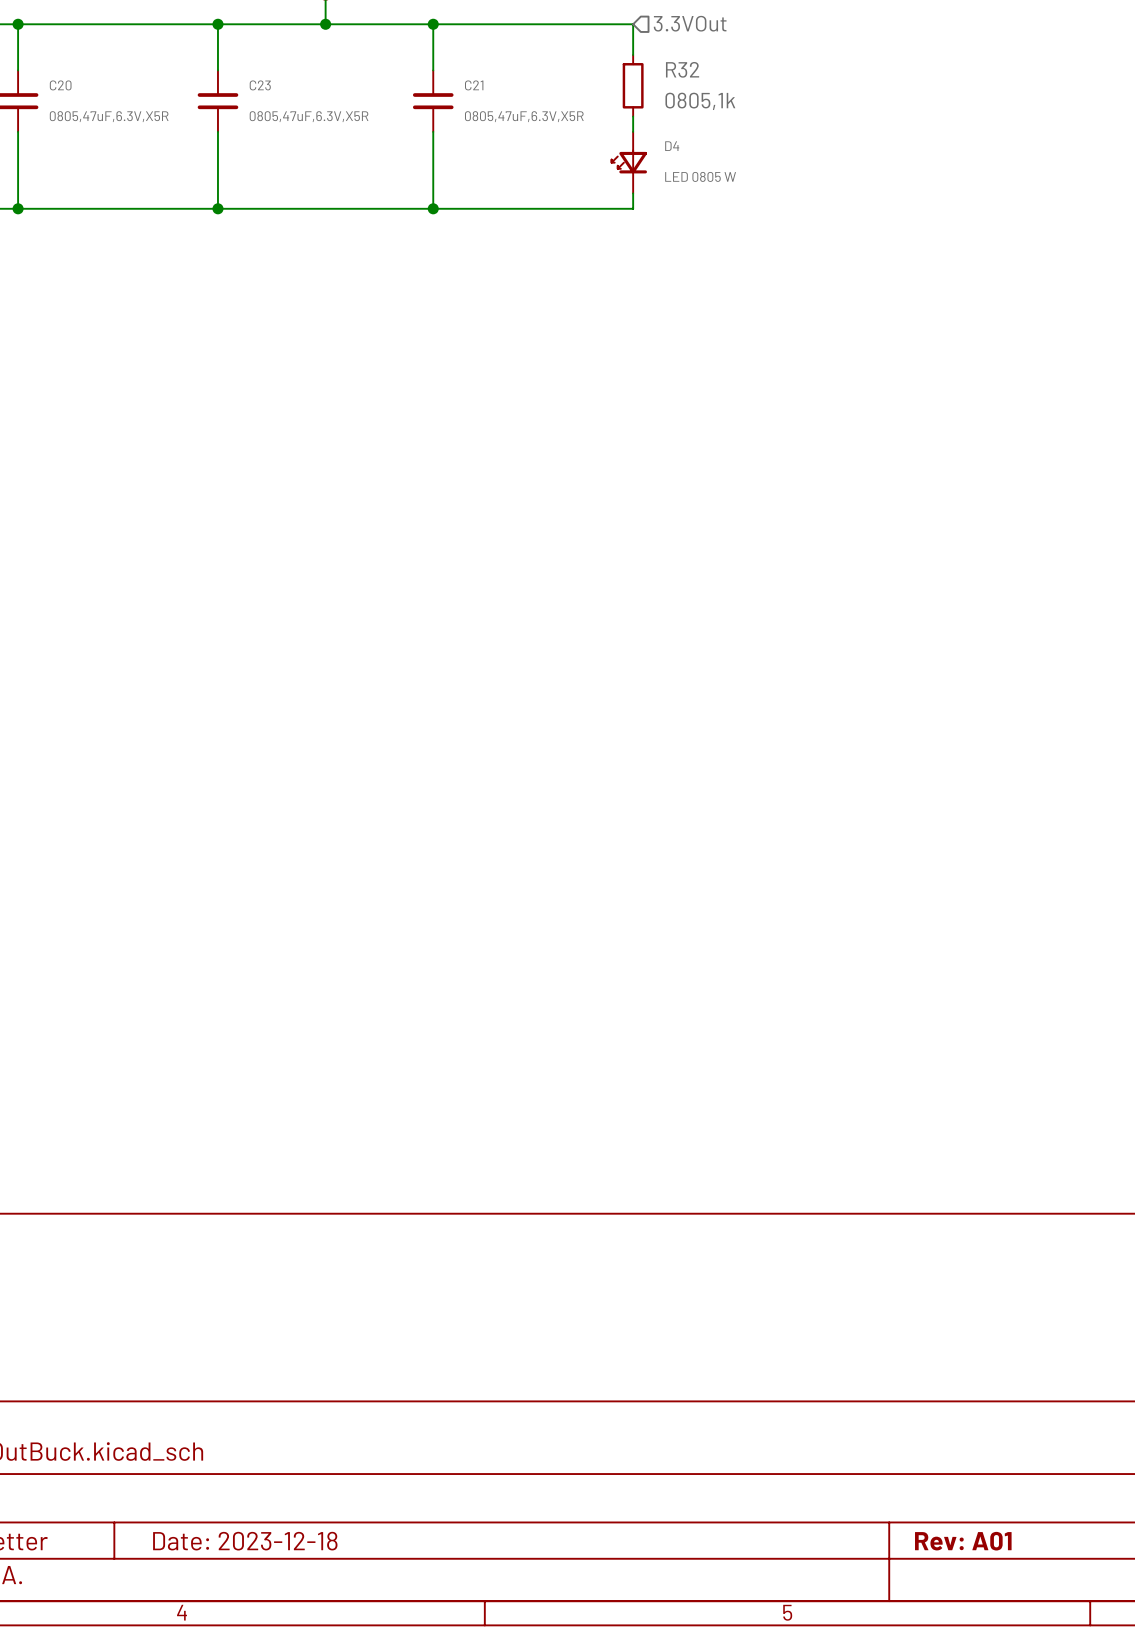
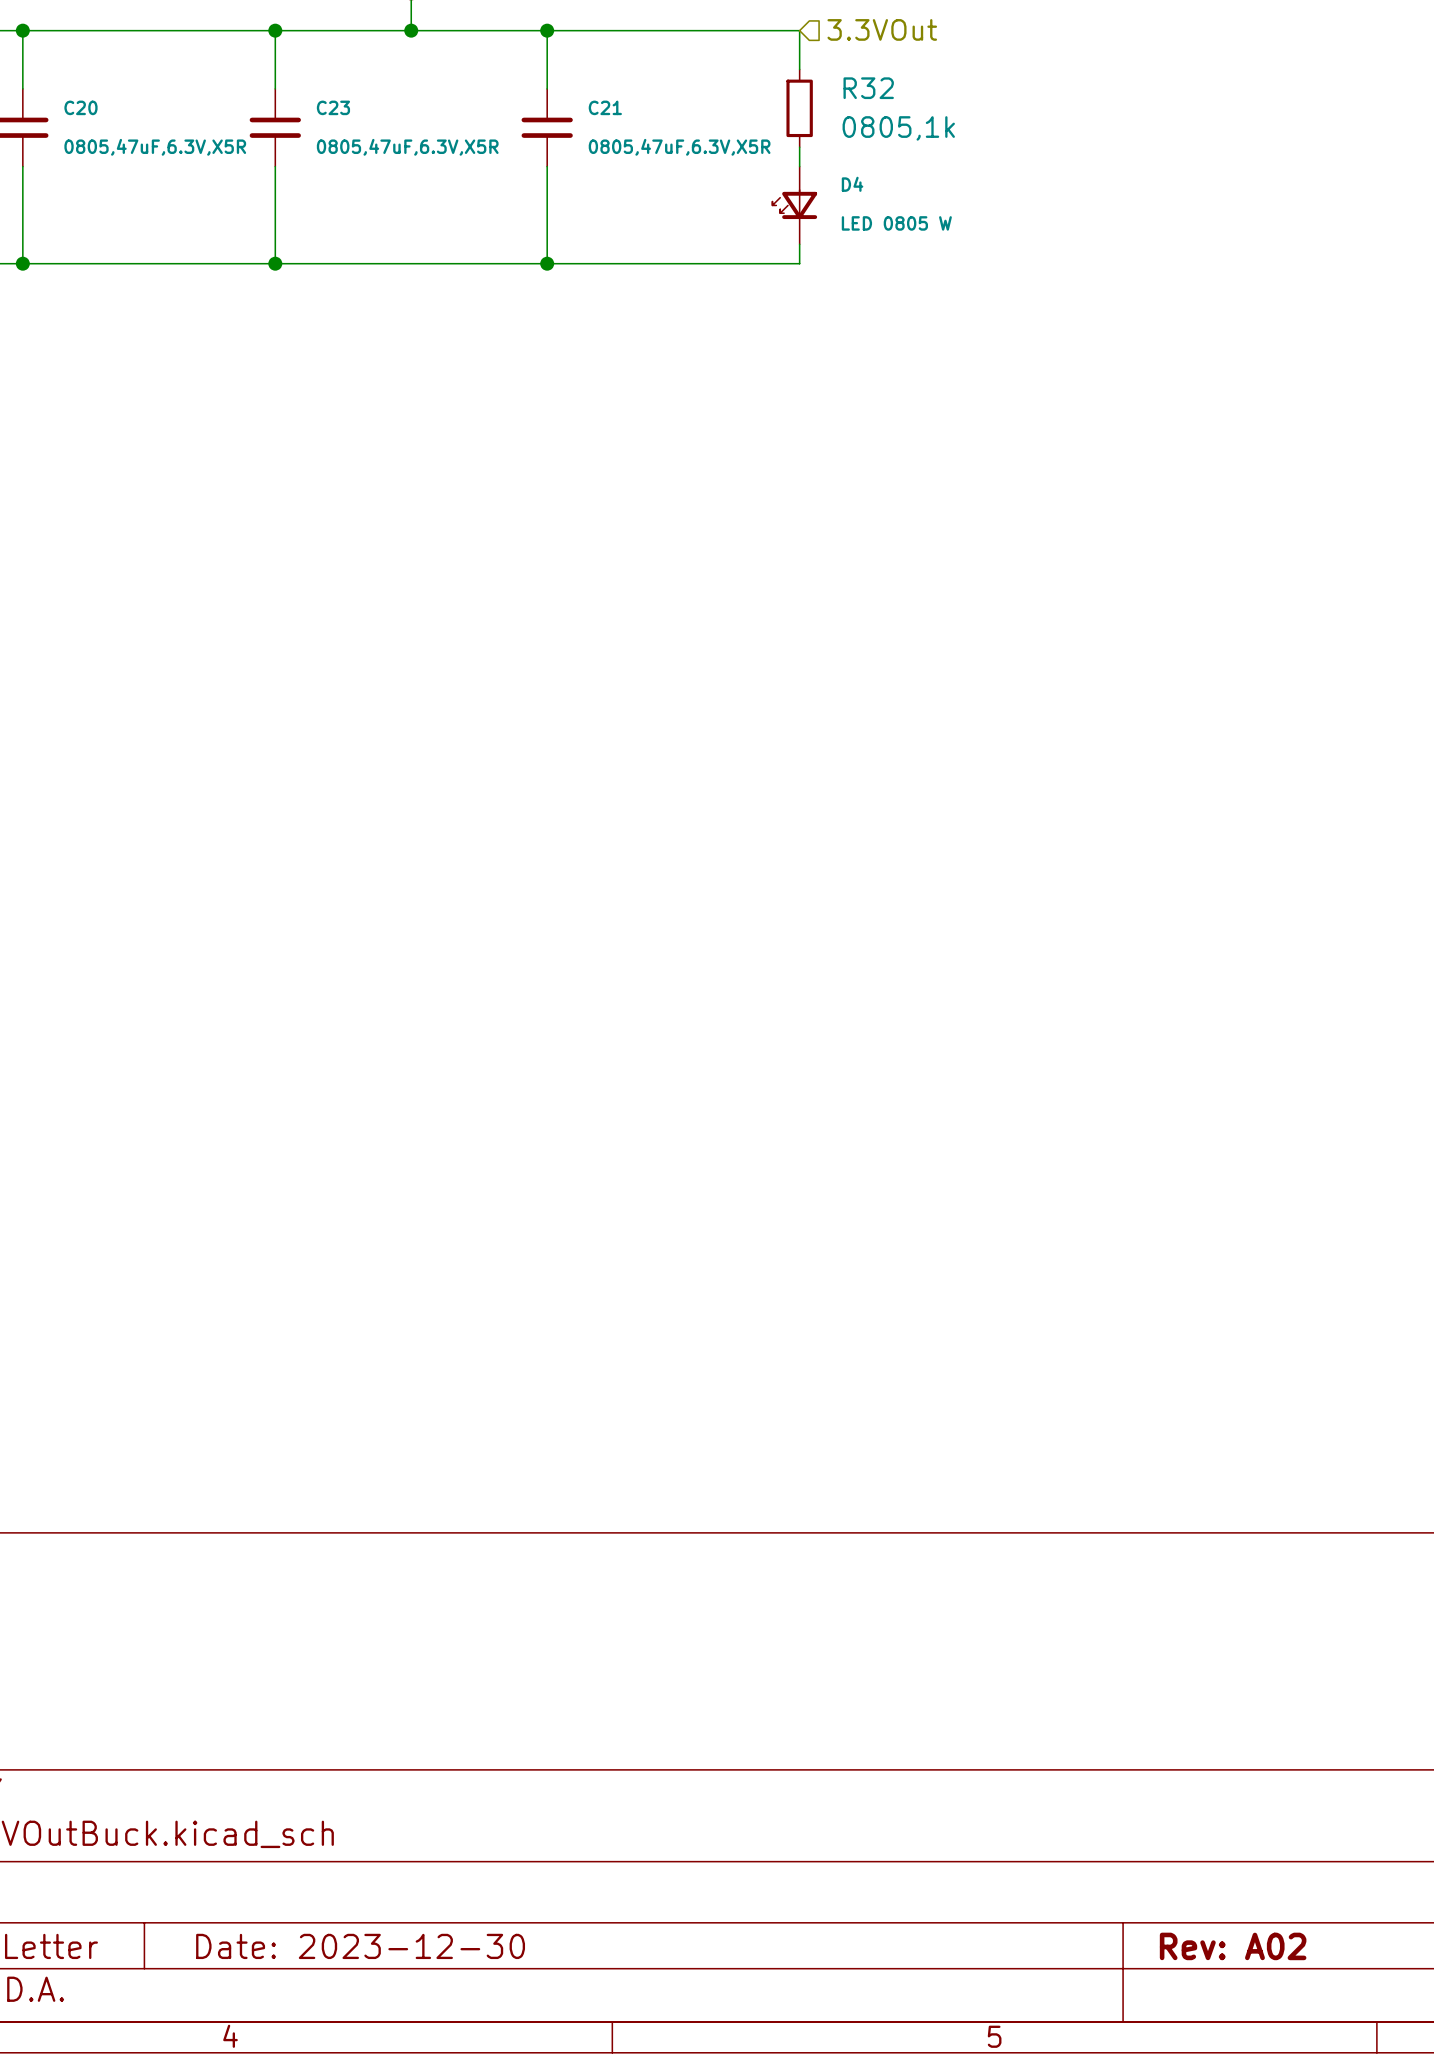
title block: Date: 2023-12-18 (245, 1541) -> Date: 2023-12-30 (360, 1946)
title block: Rev: A01 (963, 1541) -> Rev: A02 (1233, 1946)

